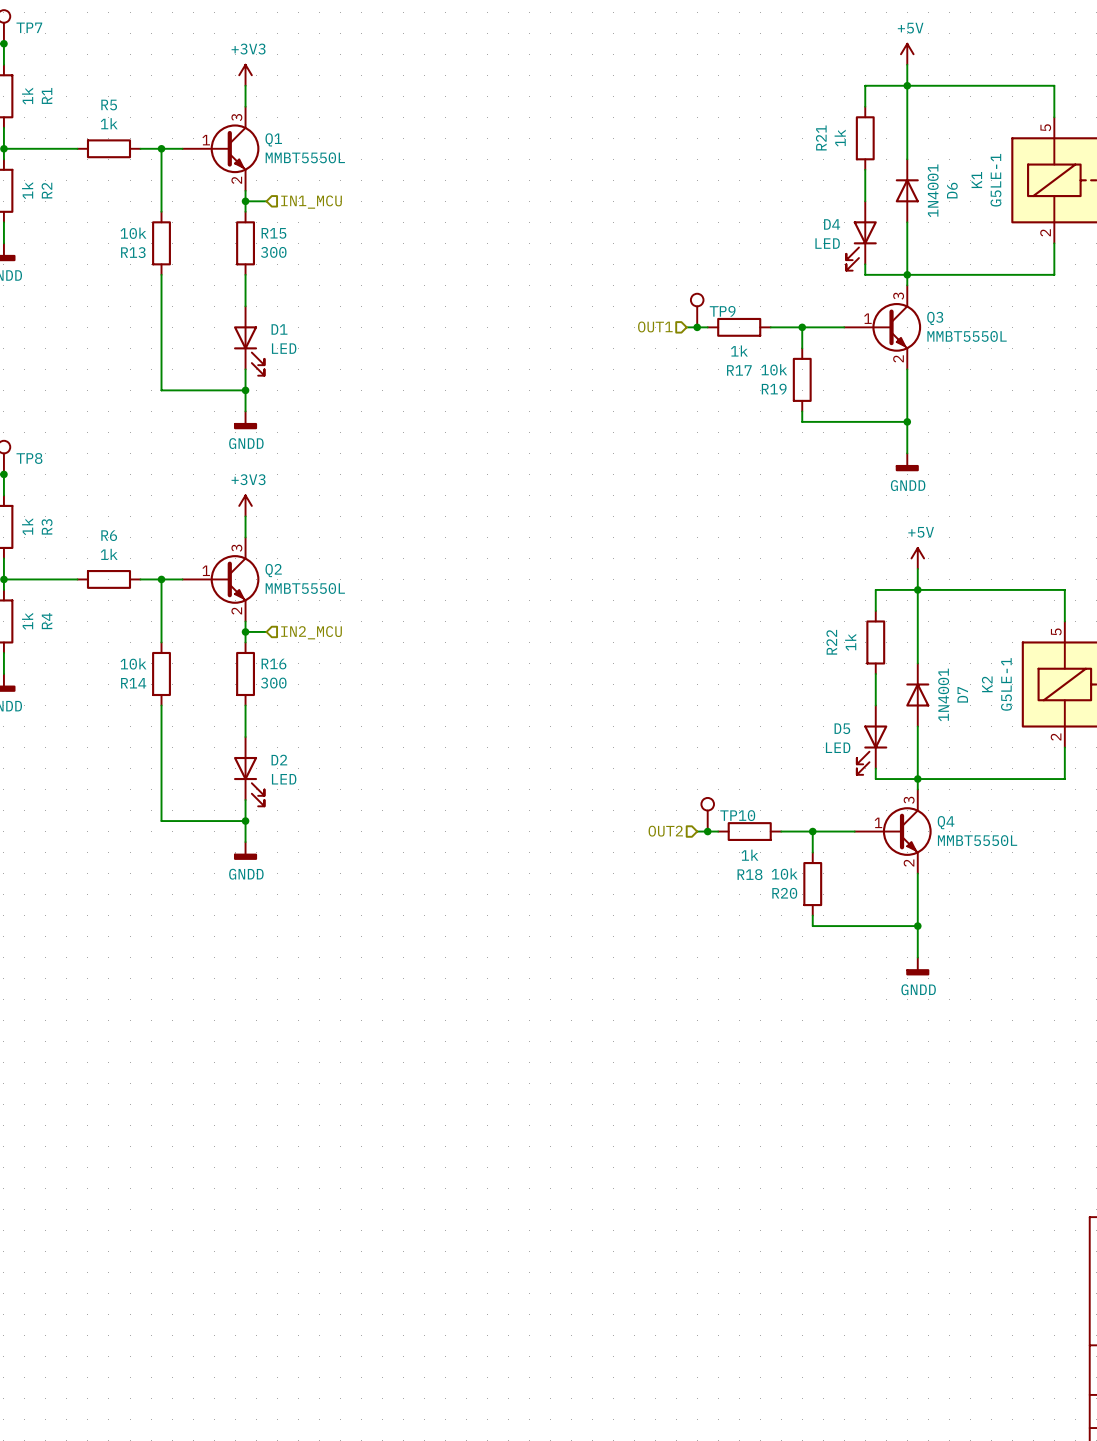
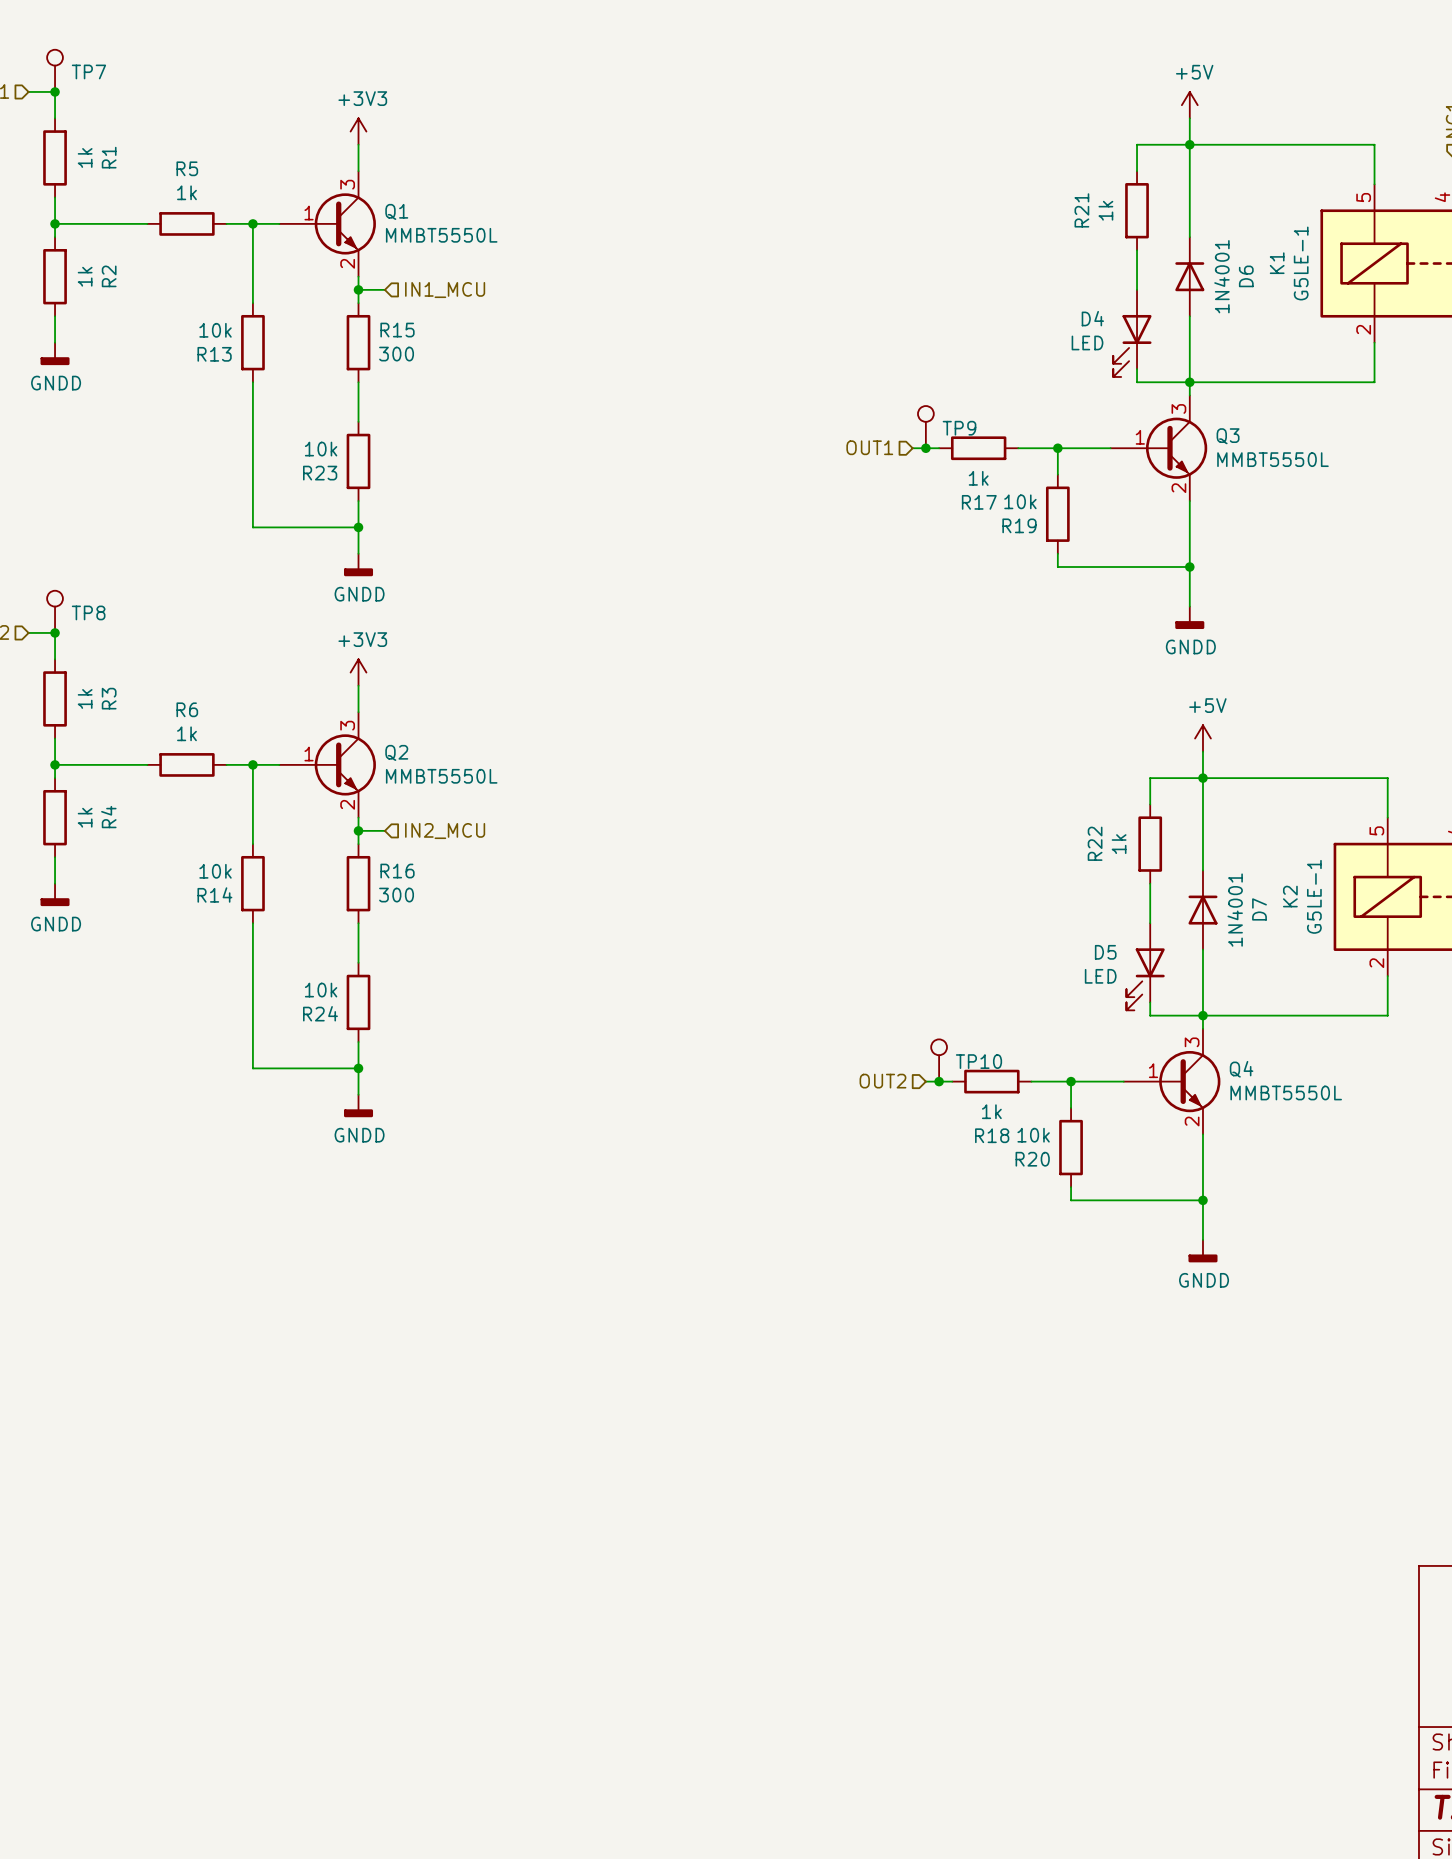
R23: none -> 10k (358, 461)
D1: LED (249, 341) -> none
R24: none -> 10k (358, 1002)
D2: LED (249, 771) -> none

